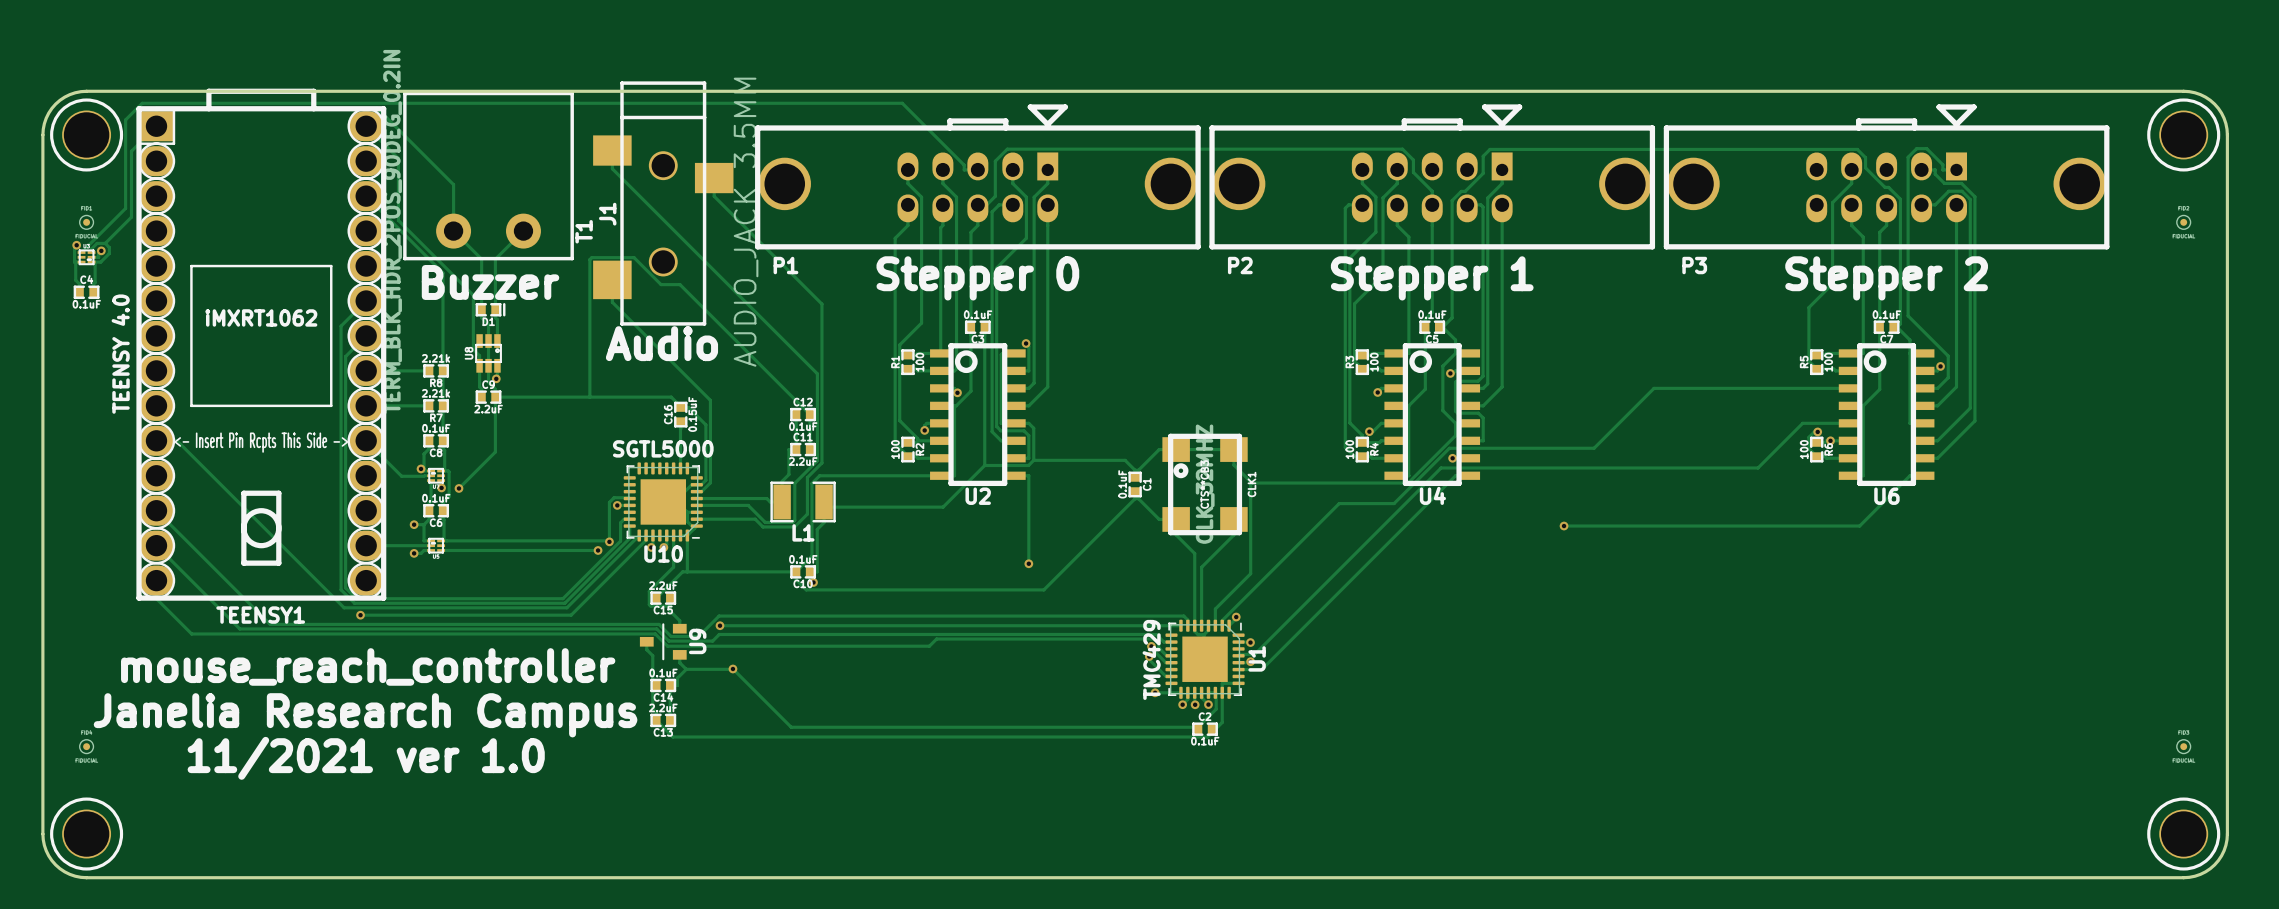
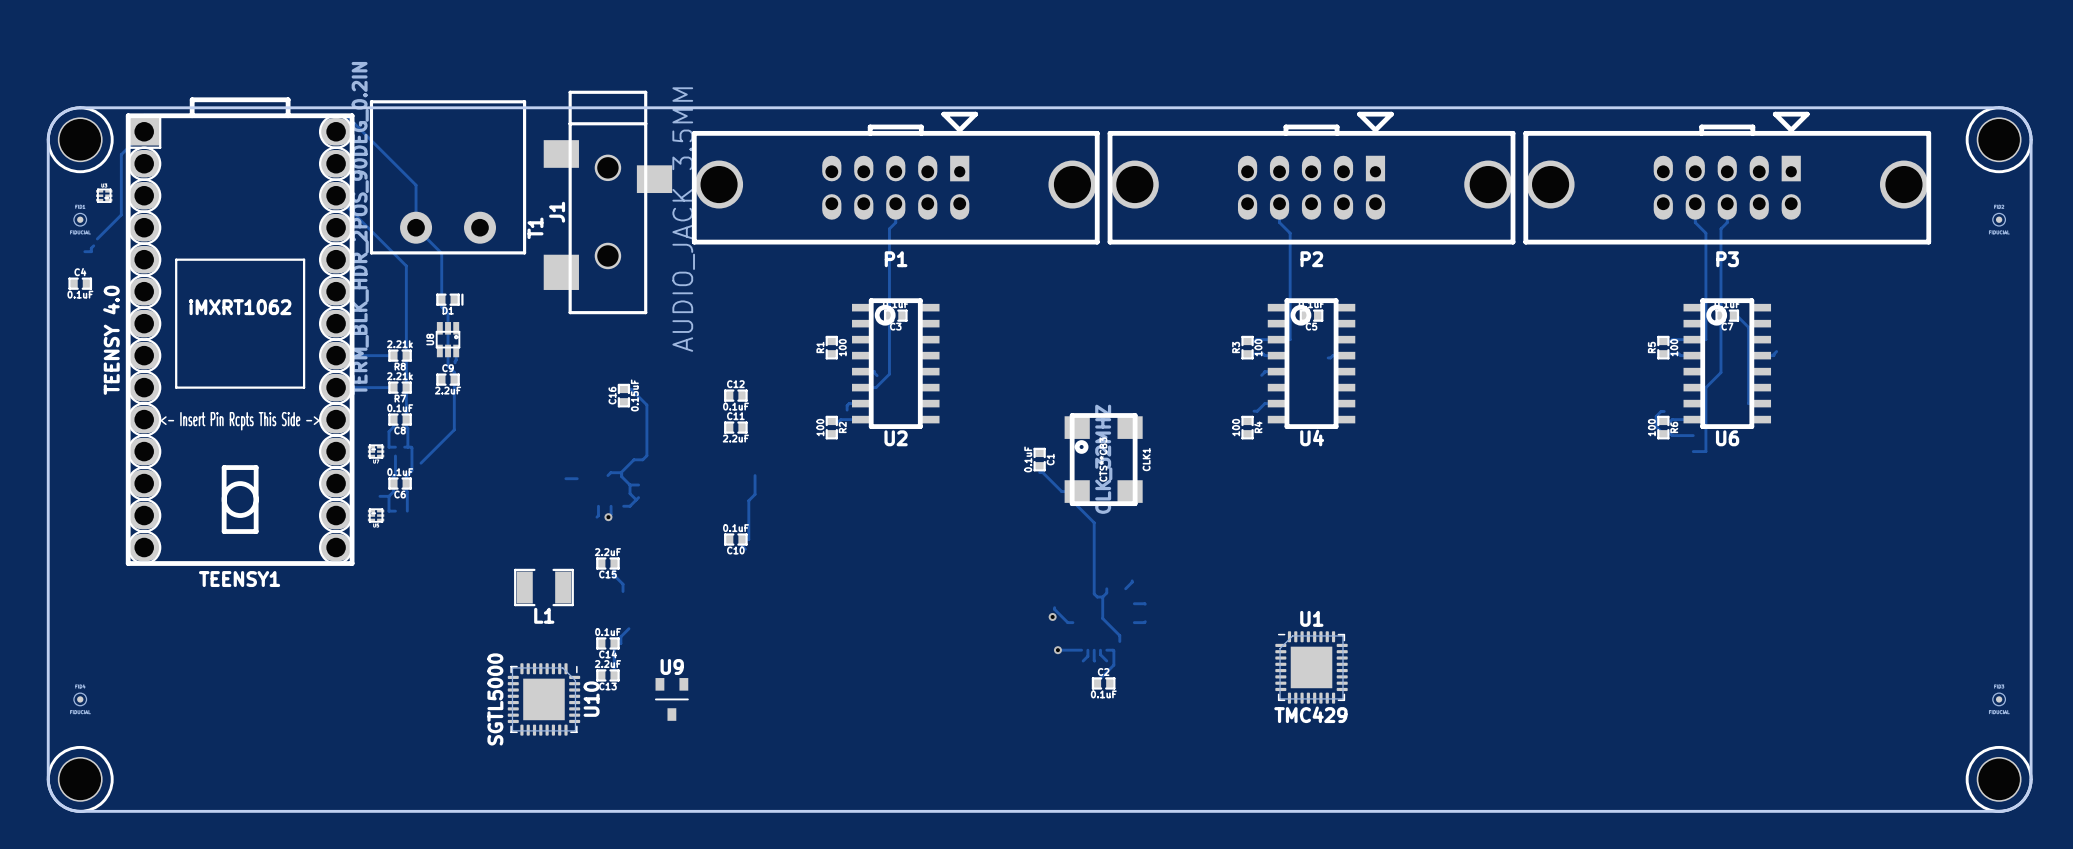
board edge: (2183, 91) (2200, 94) (2214, 104) (2224, 118) (2227, 134) (2227, 834) -> none
board edge: (2183, 91) (86, 91) (69, 94) (51, 108) (44, 123) (42, 134) (42, 834) (46, 850) (55, 864) (69, 874) (86, 877) (2183, 877) (2200, 874) (2214, 864) (2224, 850) (2227, 834) -> none
board edge: none -> (80, 107) (1999, 107) (2011, 110) (2021, 117) (2026, 123) (2031, 139) (2031, 779) (2028, 791) (2018, 804) (2007, 810) (1999, 811) (80, 811) (68, 808) (54, 798) (49, 787) (48, 779) (48, 139) (50, 127) (57, 117) (68, 110) (80, 107)
track: (366, 126) (398, 158) (398, 220) (473, 295) (473, 349) (479, 355) (479, 387) (481, 389) (481, 397) -> none
track: (612, 150) (612, 168) (817, 373) (817, 460) (794, 483) (794, 520) (792, 522) (765, 522) (748, 505) (696, 505) -> none
track: (907, 169) (907, 183) (921, 197) (921, 323) (899, 344) (899, 420) (917, 440) -> none
track: (942, 169) (942, 183) (956, 197) (956, 368) (954, 370) (907, 369) -> none
track: (977, 169) (964, 169) (964, 165) (902, 103) (142, 103) (125, 119) (125, 208) (81, 252) -> none
track: (1012, 169) (1012, 183) (1026, 197) (1026, 238) (996, 267) (996, 426) (1000, 430) (1024, 430) (1028, 435) (1028, 458) (1015, 458) -> none
track: (1047, 169) (1047, 183) (1034, 197) (1034, 383) (1028, 388) (1015, 388) -> none
track: (1362, 169) (1362, 183) (1375, 197) (1375, 232) (1349, 258) (1349, 422) (1362, 435) (1362, 442) (1395, 440) -> none
track: (1397, 169) (1397, 183) (1383, 197) (1383, 275) (1354, 303) (1354, 361) (1362, 369) -> none
track: (1502, 169) (1502, 183) (1487, 197) (1487, 383) (1483, 388) (1469, 388) -> none
track: (1851, 169) (1851, 183) (1832, 202) (1832, 283) (1808, 307) (1808, 361) (1816, 369) -> none
track: (1921, 169) (1935, 169) (1935, 174) (1944, 183) (1961, 183) (1974, 196) (1974, 420) (1937, 458) (1923, 458) -> none
track: (1956, 169) (1942, 169) (1942, 164) (1926, 148) (1916, 148) (1908, 157) (1908, 315) (1948, 356) (1948, 377) (1937, 388) (1923, 388) -> none
track: (714, 178) (714, 196) (821, 304) (821, 462) (807, 477) (807, 514) (794, 526) (763, 526) (755, 519) (696, 519) -> none
track: (907, 204) (907, 225) (895, 238) (895, 443) (908, 456) -> none
track: (942, 204) (942, 225) (940, 227) (940, 353) (907, 355) -> none
track: (1012, 204) (999, 204) (992, 211) (992, 431) (1001, 440) (1015, 440) -> none
track: (1047, 204) (1047, 386) (1028, 405) (1015, 405) -> none
track: (1362, 204) (1348, 204) (1345, 208) (1345, 447) (1354, 456) (1395, 458) -> none
track: (1467, 204) (1480, 204) (1483, 207) (1483, 376) (1478, 381) (1455, 382) (1455, 411) (1457, 413) (1478, 413) (1483, 417) (1483, 440) (1469, 440) -> none
track: (1502, 204) (1502, 386) (1483, 405) (1469, 405) -> none
track: (1921, 204) (1935, 204) (1948, 191) (1962, 191) (1970, 199) (1970, 408) (1937, 440) (1923, 440) -> none
track: (1956, 204) (1956, 386) (1937, 405) (1923, 405) -> none
track: (977, 213) (995, 196) (995, 161) (1007, 149) (1402, 149) (1413, 160) (1413, 172) (1432, 191) (1432, 312) (1425, 319) (1425, 389) (1408, 405) -> none
track: (523, 231) (495, 259) (497, 341) -> none
track: (76, 245) (74, 247) (74, 262) (81, 262) -> none
via: (76, 245) -> none
via: (101, 250) -> none
track: (91, 252) (91, 248) (97, 243) (105, 243) (109, 247) (109, 253) (100, 262) (91, 262) -> none
part position: (86, 257) -> (104, 195)
track: (75, 262) (75, 280) (79, 284) (79, 292) -> none
track: (95, 262) (93, 292) -> none
P1 name position: P1 (785, 265) -> P1 (896, 259)
P2 name position: P2 (1240, 265) -> P2 (1311, 259)
P3 name position: P3 (1694, 265) -> P3 (1727, 259)
text: Stepper 0 (977, 278) -> none
text: Stepper 1 (1432, 278) -> none
text: Stepper 2 (1886, 278) -> none
track: (612, 279) (612, 302) (710, 400) (710, 482) (701, 491) (696, 491) -> none
text: Buzzer (490, 282) -> none
track: (366, 301) (341, 326) (341, 589) (354, 603) (564, 603) (629, 538) (629, 526) -> none
track: (984, 327) (984, 465) -> none
track: (1442, 327) (1452, 317) (1452, 200) (1461, 191) (1465, 191) (1483, 173) (1483, 156) (1490, 149) (1857, 149) (1865, 157) (1865, 167) (1885, 187) (1888, 187) (1900, 199) (1900, 323) (1897, 327) (1893, 327) -> none
track: (1442, 327) (1455, 340) (1455, 353) -> none
track: (366, 335) (345, 356) (345, 587) (356, 598) (562, 598) (620, 541) (620, 522) (624, 519) (629, 519) -> none
text: Audio (661, 343) -> none
track: (1026, 343) (1028, 346) (1028, 370) (1015, 370) -> none
via: (1026, 343) -> none
track: (1015, 353) (1001, 354) (1001, 423) (1028, 423) (1033, 428) (1033, 460) -> none
track: (1455, 353) (1442, 366) (1442, 410) (1455, 423) -> none
via: (1940, 366) -> none
via: (1450, 373) -> none
via: (496, 378) -> none
track: (1849, 388) (1653, 388) (1594, 448) (1449, 448) (1394, 503) (1339, 503) (1222, 620) (1222, 625) -> none
via: (957, 392) -> none
via: (1377, 392) -> none
track: (495, 397) (671, 397) (681, 407) -> none
track: (589, 397) (589, 259) (591, 257) (634, 257) (661, 284) (680, 284) (809, 414) (809, 449) -> none
track: (954, 405) (954, 475) (819, 475) (811, 483) (811, 556) (796, 571) -> none
track: (1408, 405) (1408, 475) -> none
track: (796, 414) (796, 449) (788, 449) (788, 474) (782, 481) (782, 501) (770, 501) (766, 498) (696, 498) -> none
U2 position: (977, 414) -> (895, 363)
U4 position: (1432, 414) -> (1311, 363)
U6 position: (1886, 414) -> (1727, 363)
track: (680, 421) (680, 468) -> none
track: (1455, 423) (1455, 435) (1408, 483) (1250, 483) -> none
track: (1849, 423) (1802, 423) (1758, 467) (1441, 467) (1254, 654) (1238, 655) -> none
via: (924, 430) -> none
via: (1369, 431) -> none
via: (1817, 431) -> none
track: (156, 440) (177, 440) (344, 607) (566, 607) (639, 535) -> none
track: (366, 440) (401, 476) (431, 475) -> none
via: (1830, 440) -> none
track: (907, 456) (940, 458) -> none
via: (1452, 458) -> none
track: (1033, 460) (1028, 465) (984, 465) -> none
track: (1033, 460) (1125, 460) (1135, 470) -> none
track: (984, 465) (943, 507) (824, 507) -> none
via: (421, 468) -> none
track: (1135, 470) (1138, 470) (1159, 449) (1233, 449) (1233, 465) (1250, 481) (1250, 573) (1215, 609) (1215, 625) -> none
part position: (436, 475) -> (376, 451)
track: (1015, 475) (1028, 475) (1028, 563) -> none
track: (1469, 475) (1455, 475) (1261, 669) (1238, 669) -> none
track: (1923, 475) (1909, 475) (1859, 526) (1564, 526) -> none
via: (441, 487) -> none
via: (458, 488) -> none
track: (1135, 491) (1135, 498) (1043, 589) (806, 589) (796, 579) (796, 571) -> none
track: (629, 498) (614, 497) (609, 502) (609, 541) -> none
U10 rotation: 0° (663, 501) -> 90° counterclockwise (543, 699)
U10 position: (663, 501) -> (543, 699)
L1 position: (803, 501) -> (543, 587)
via: (617, 505) -> none
track: (156, 510) (270, 624) (659, 624) (671, 636) (698, 636) (719, 616) (1183, 616) (1187, 620) (1187, 625) -> none
track: (1233, 519) (1233, 534) (1201, 567) (1201, 625) -> none
via: (414, 524) -> none
via: (1564, 526) -> none
track: (646, 535) (646, 540) (571, 615) (360, 615) -> none
track: (673, 535) (673, 567) (649, 591) (650, 606) (670, 606) -> none
track: (687, 535) (687, 571) -> none
track: (441, 540) (609, 540) -> none
via: (609, 541) -> none
track: (156, 545) (239, 628) (656, 628) (668, 641) (712, 641) (719, 634) (1156, 634) (1163, 642) (1171, 642) -> none
track: (366, 545) (431, 545) -> none
part position: (436, 545) -> (376, 515)
via: (651, 547) -> none
track: (431, 550) (414, 553) -> none
track: (441, 550) (598, 550) -> none
via: (598, 550) -> none
via: (414, 553) -> none
via: (1028, 563) -> none
track: (796, 571) (682, 571) (656, 598) -> none
track: (156, 580) (156, 598) (191, 633) (655, 633) (667, 646) (929, 646) (936, 639) (1154, 639) (1158, 643) (1158, 647) (1166, 655) (1171, 655) -> none
via: (813, 582) -> none
via: (360, 615) -> none
via: (1236, 617) -> none
track: (720, 625) (1180, 625) -> none
via: (720, 625) -> none
track: (646, 641) (646, 649) (652, 655) (652, 708) (656, 712) (656, 720) (672, 737) (1207, 737) (1222, 722) (1222, 683) (1238, 683) -> none
U9 rotation: 0° (663, 641) -> 90° counterclockwise (671, 699)
U9 position: (663, 641) -> (671, 699)
via: (1250, 642) -> none
via: (1151, 646) -> none
track: (679, 654) (679, 662) (686, 669) (732, 668) (791, 727) (1198, 727) (1198, 729) -> none
track: (1149, 656) (1149, 659) (1166, 676) (1171, 676) -> none
U1 rotation: 0° (1205, 659) -> 90° counterclockwise (1311, 667)
U1 position: (1205, 659) -> (1311, 667)
via: (1250, 661) -> none
text: mouse_reach_controller (368, 666) -> none
via: (732, 668) -> none
via: (1182, 704) -> none
via: (1195, 704) -> none
via: (1208, 704) -> none
text: Janelia Research Campus (365, 715) -> none
text: 11/2021 ver 1.0 (366, 758) -> none

